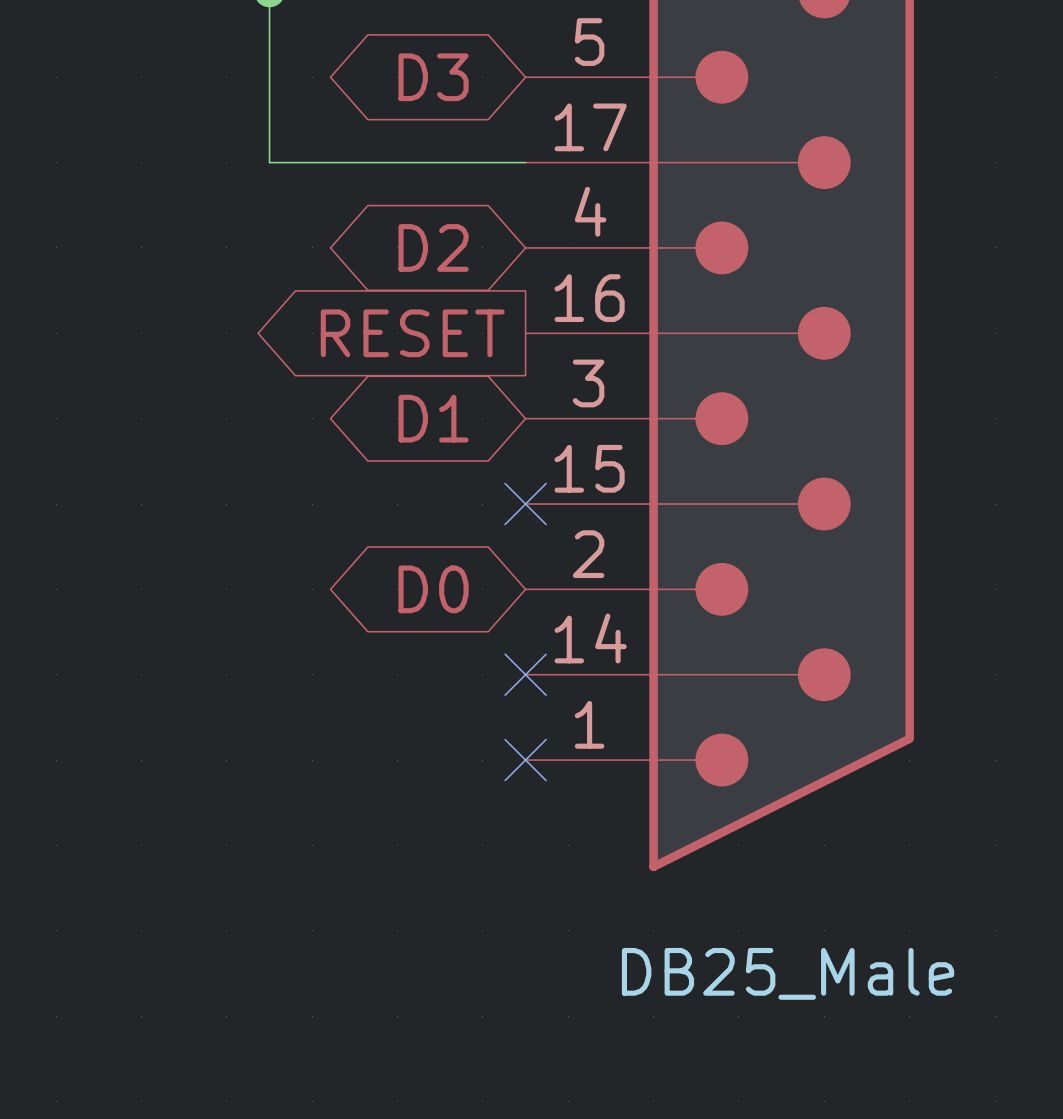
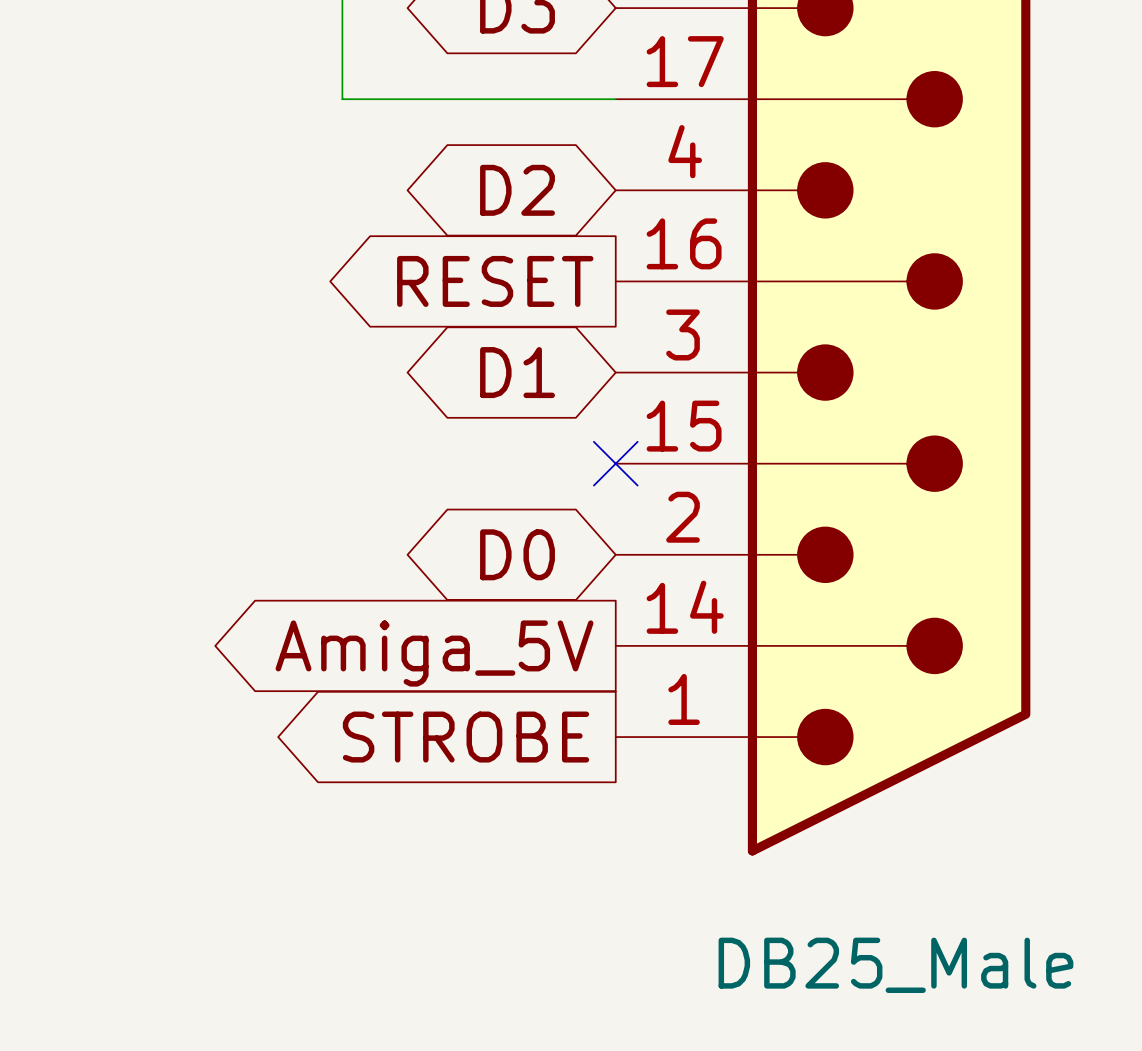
no-connect mark: (525, 674) -> none
global label: none -> Amiga_5V (434, 653)
global label: none -> STROBE (465, 737)
no-connect mark: (525, 760) -> none

